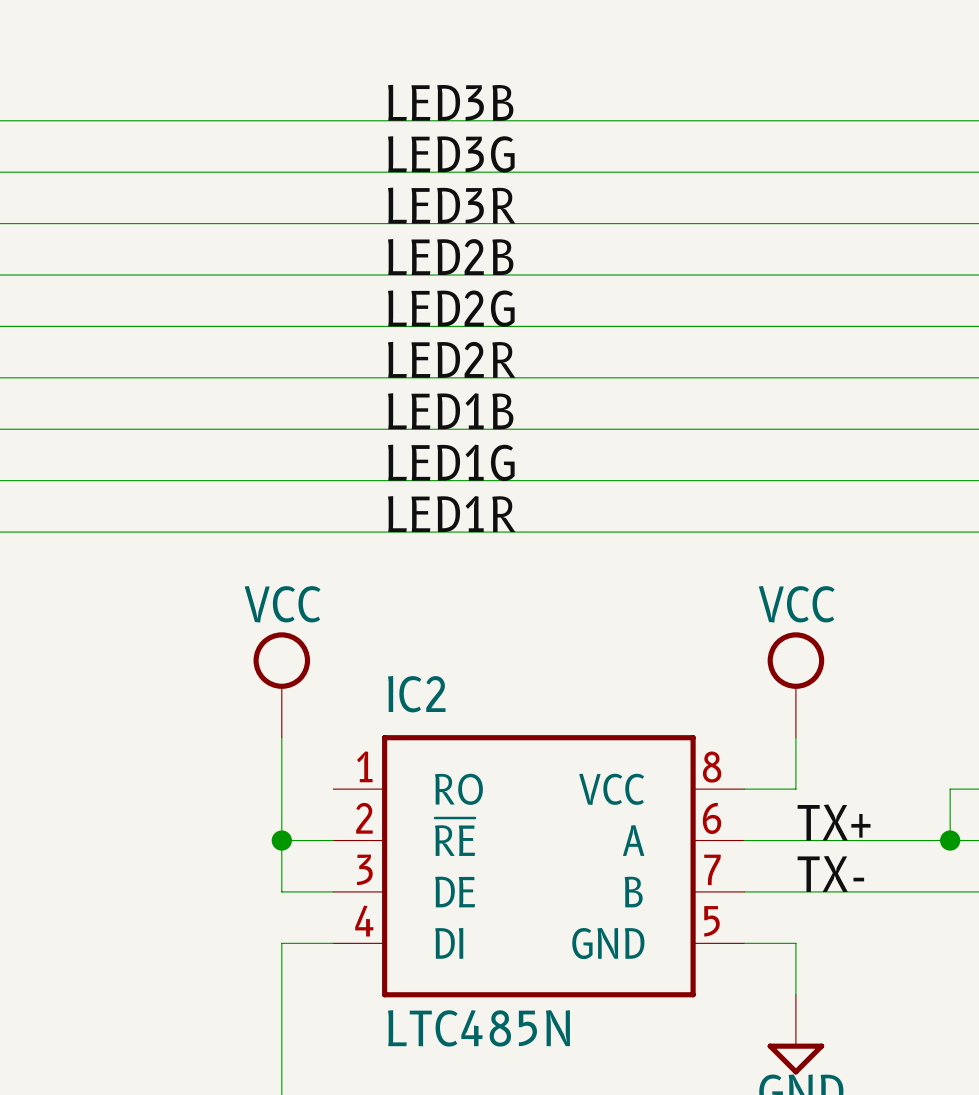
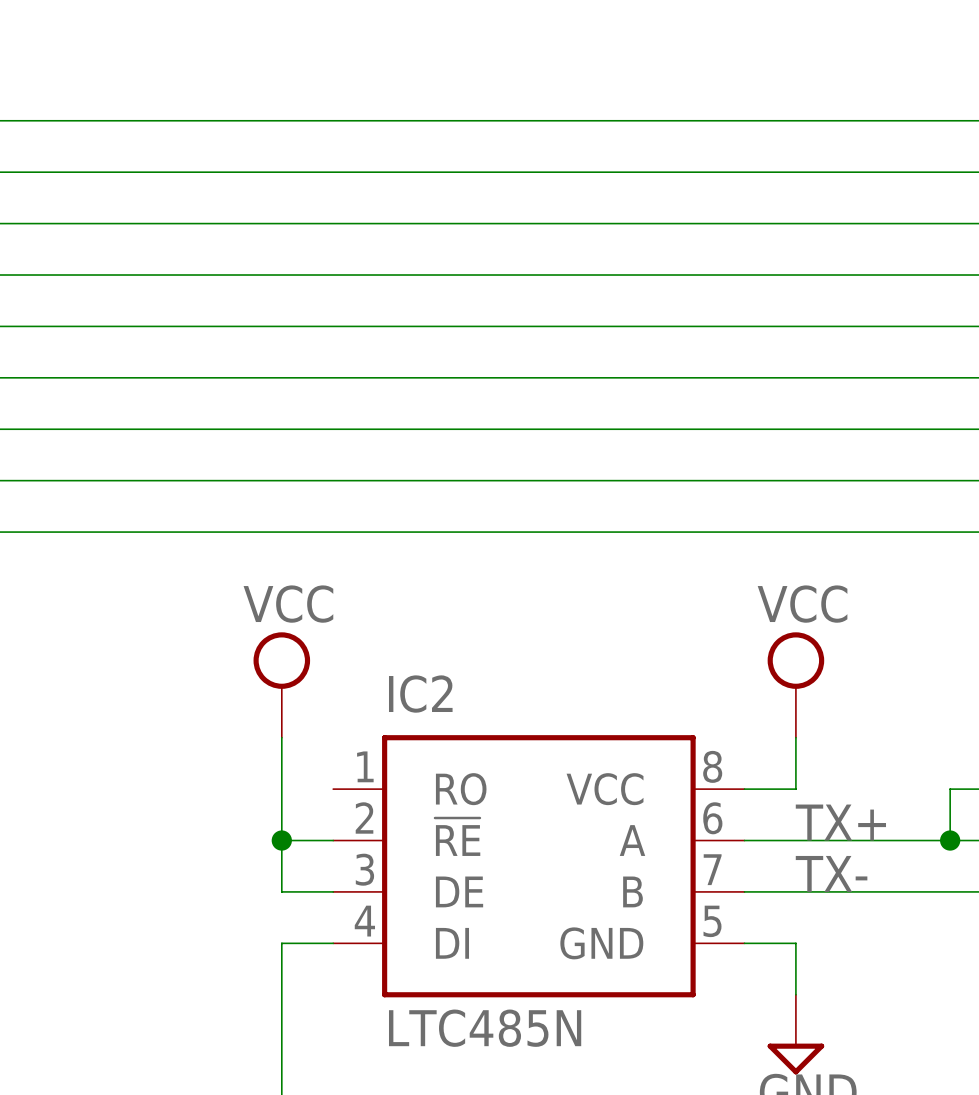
label: LED3B (450, 102) -> none
label: LED3G (451, 154) -> none
label: LED3R (451, 205) -> none
label: LED2B (450, 257) -> none
label: LED2G (451, 308) -> none
label: LED2R (451, 359) -> none
label: LED1B (450, 411) -> none
label: LED1G (451, 462) -> none
label: LED1R (451, 514) -> none

